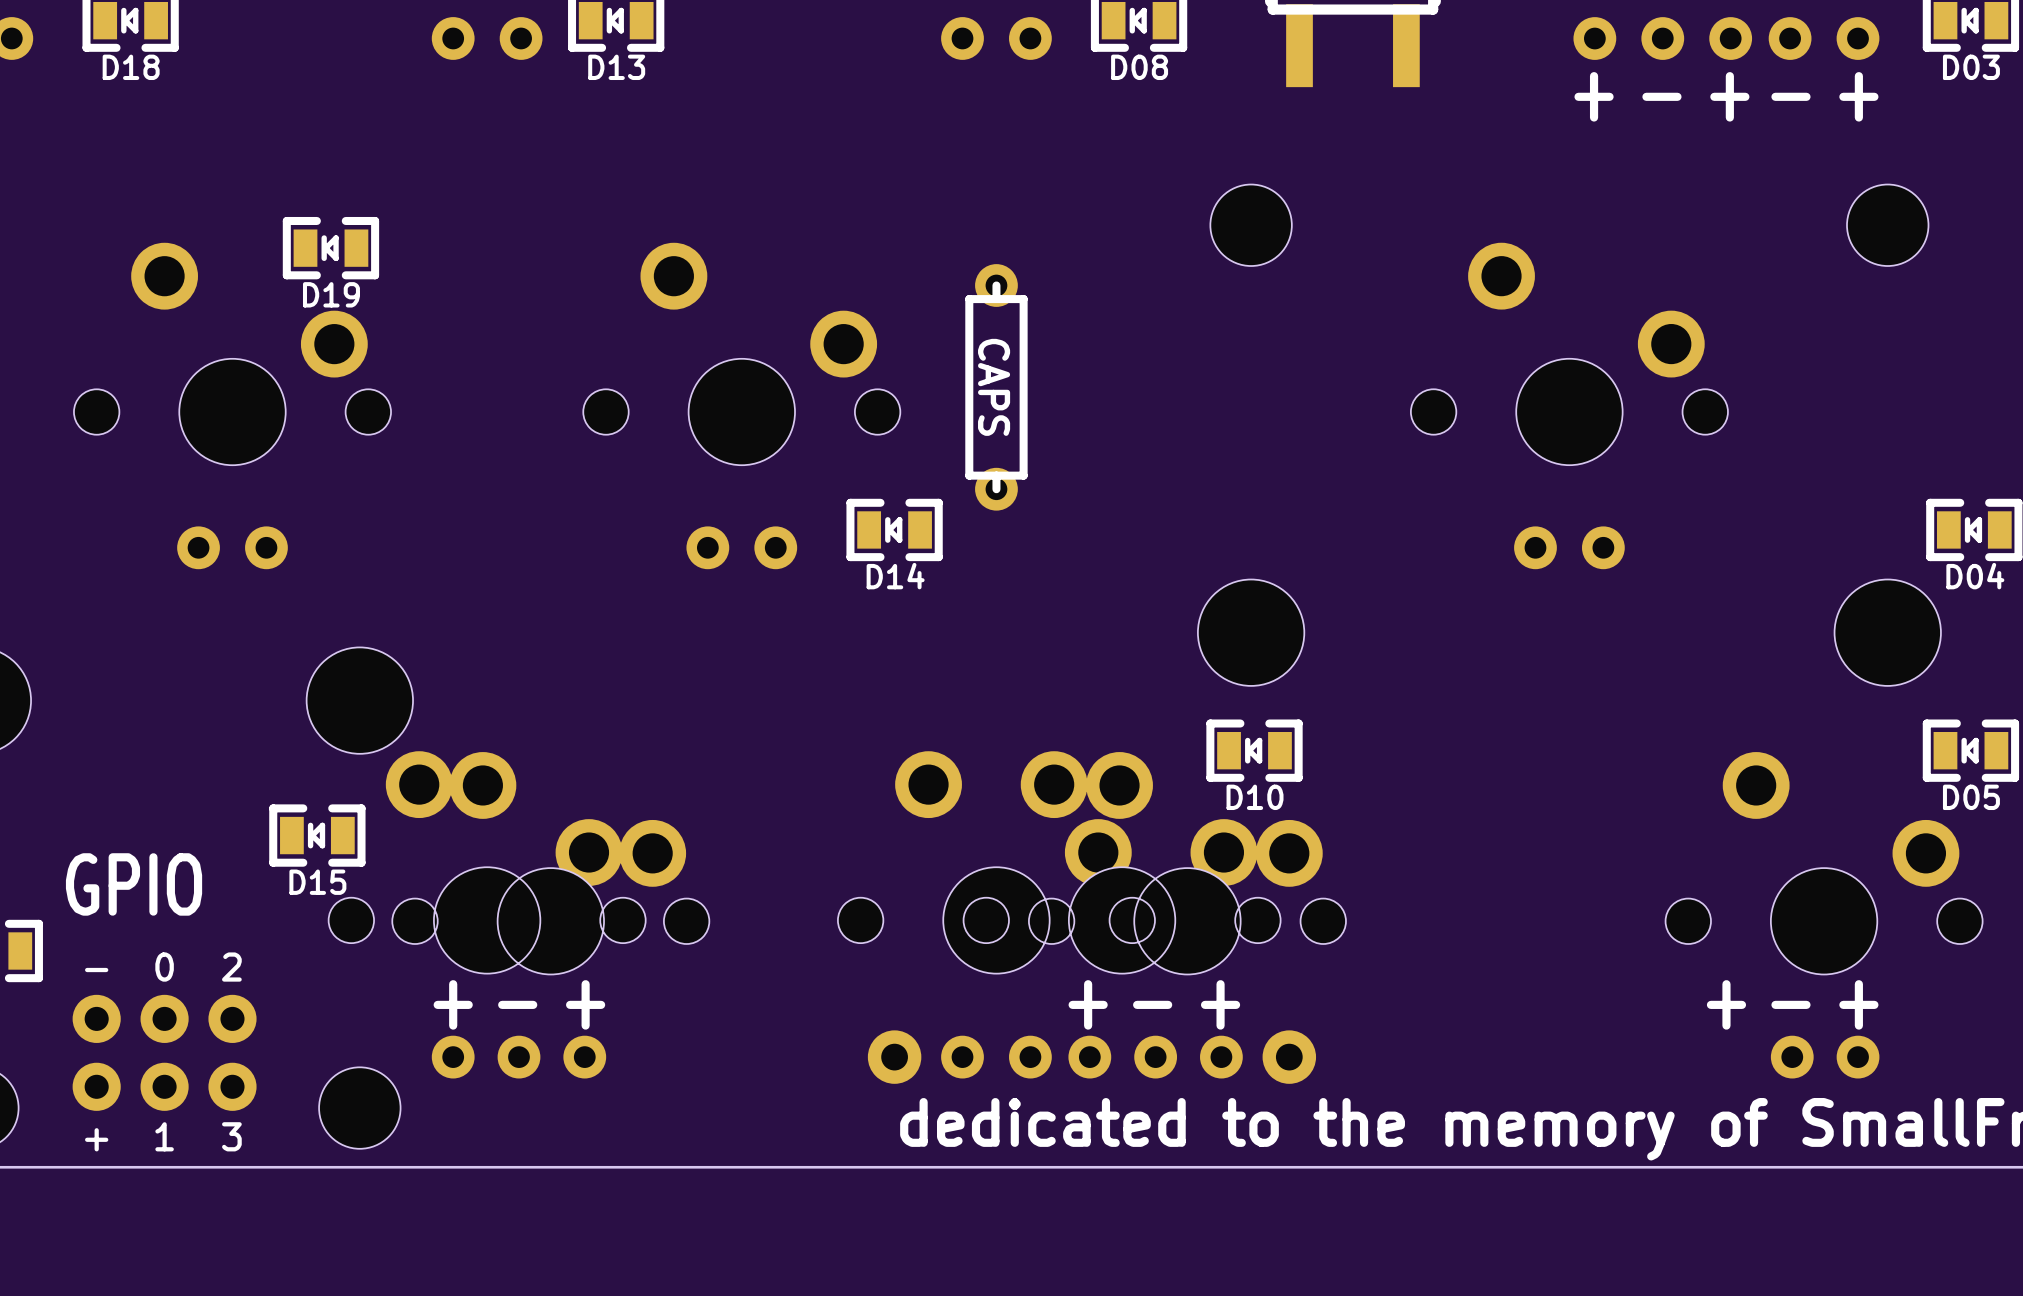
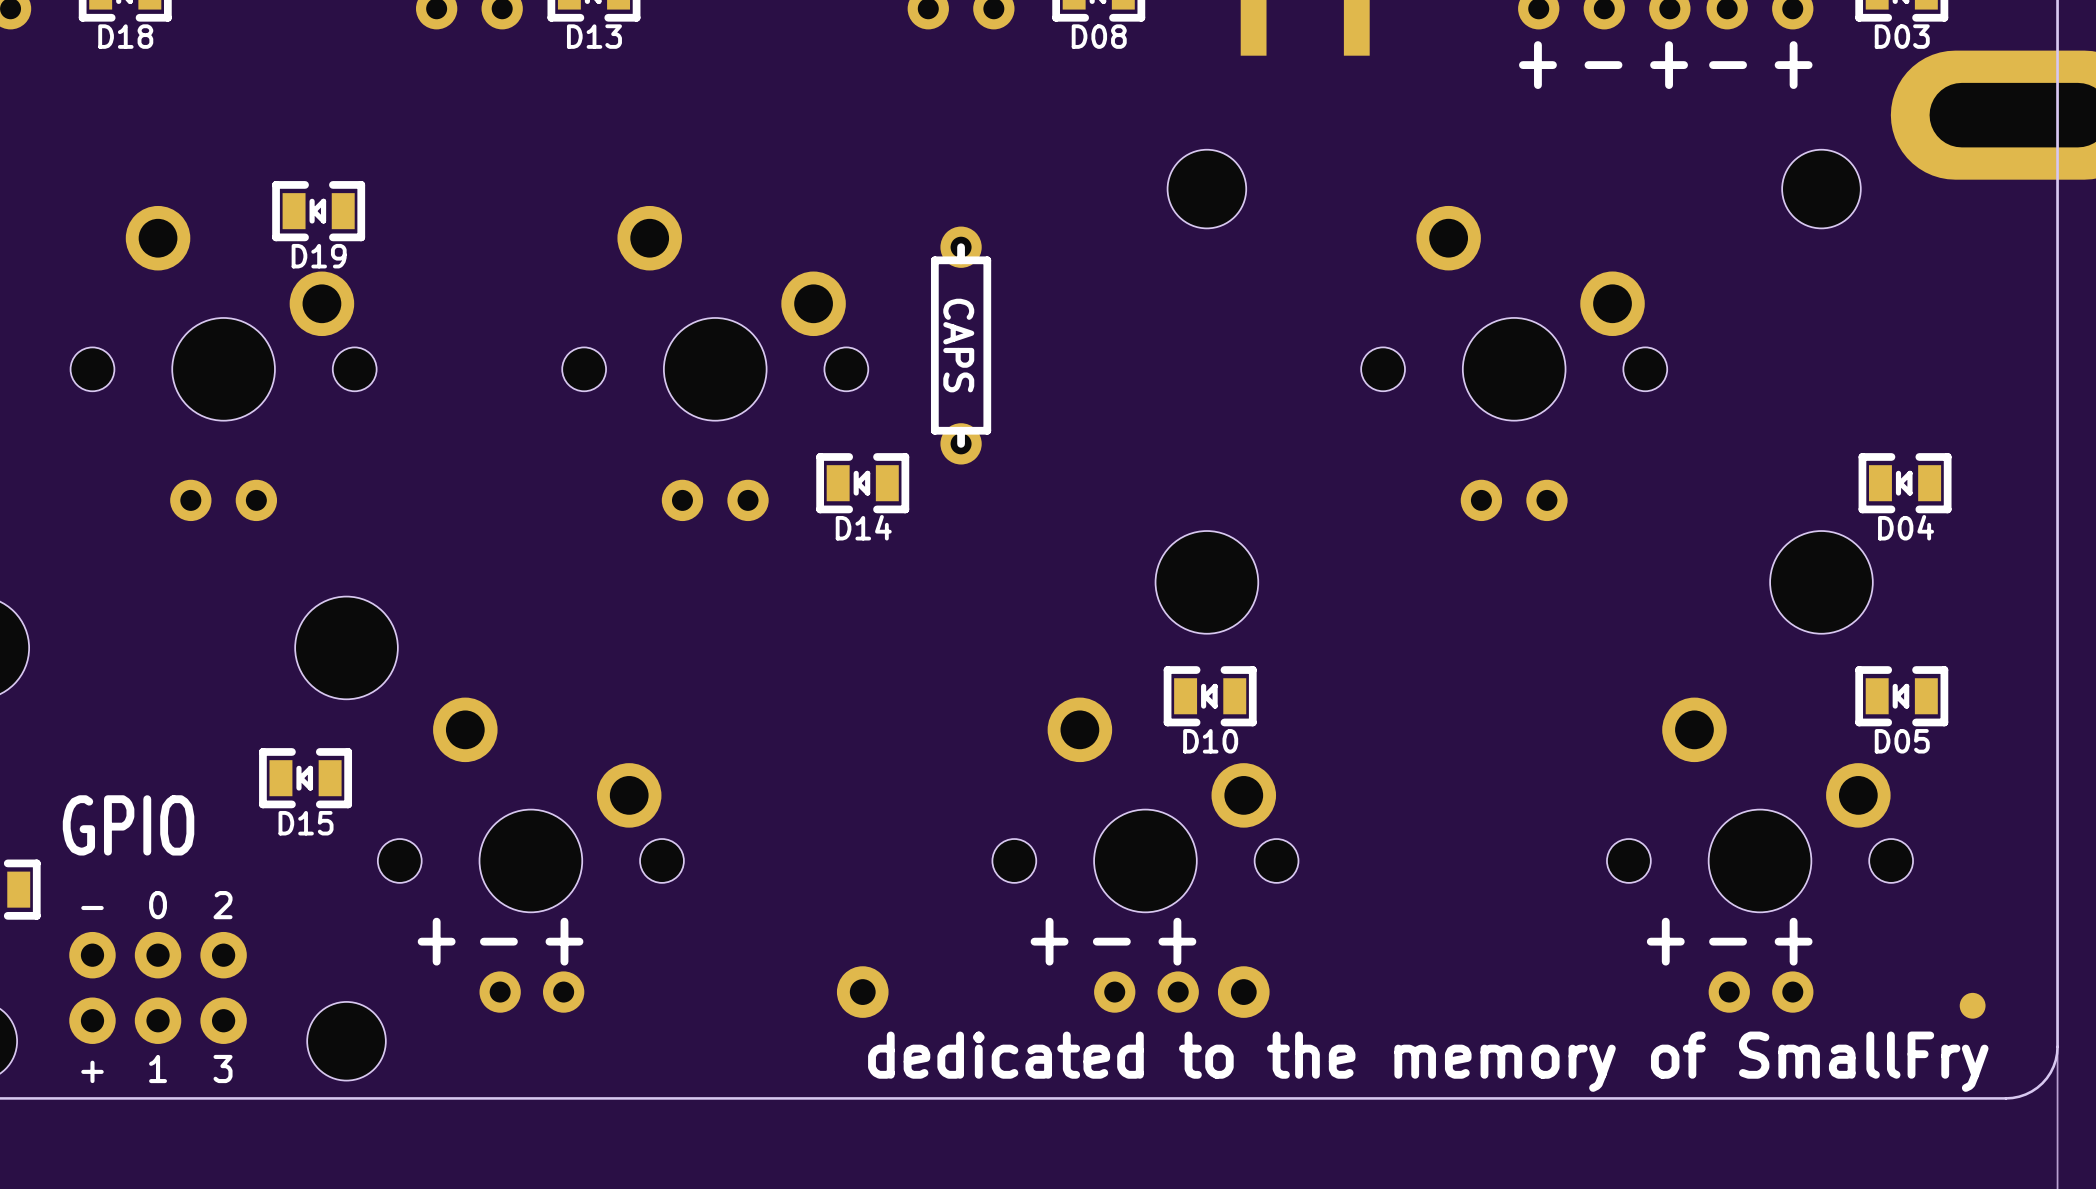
part: (487, 862) -> none
part: (996, 862) -> none
part: (1122, 862) -> none
part: (453, 1057) -> none
part: (996, 1057) -> none
part: (1089, 1057) -> none

